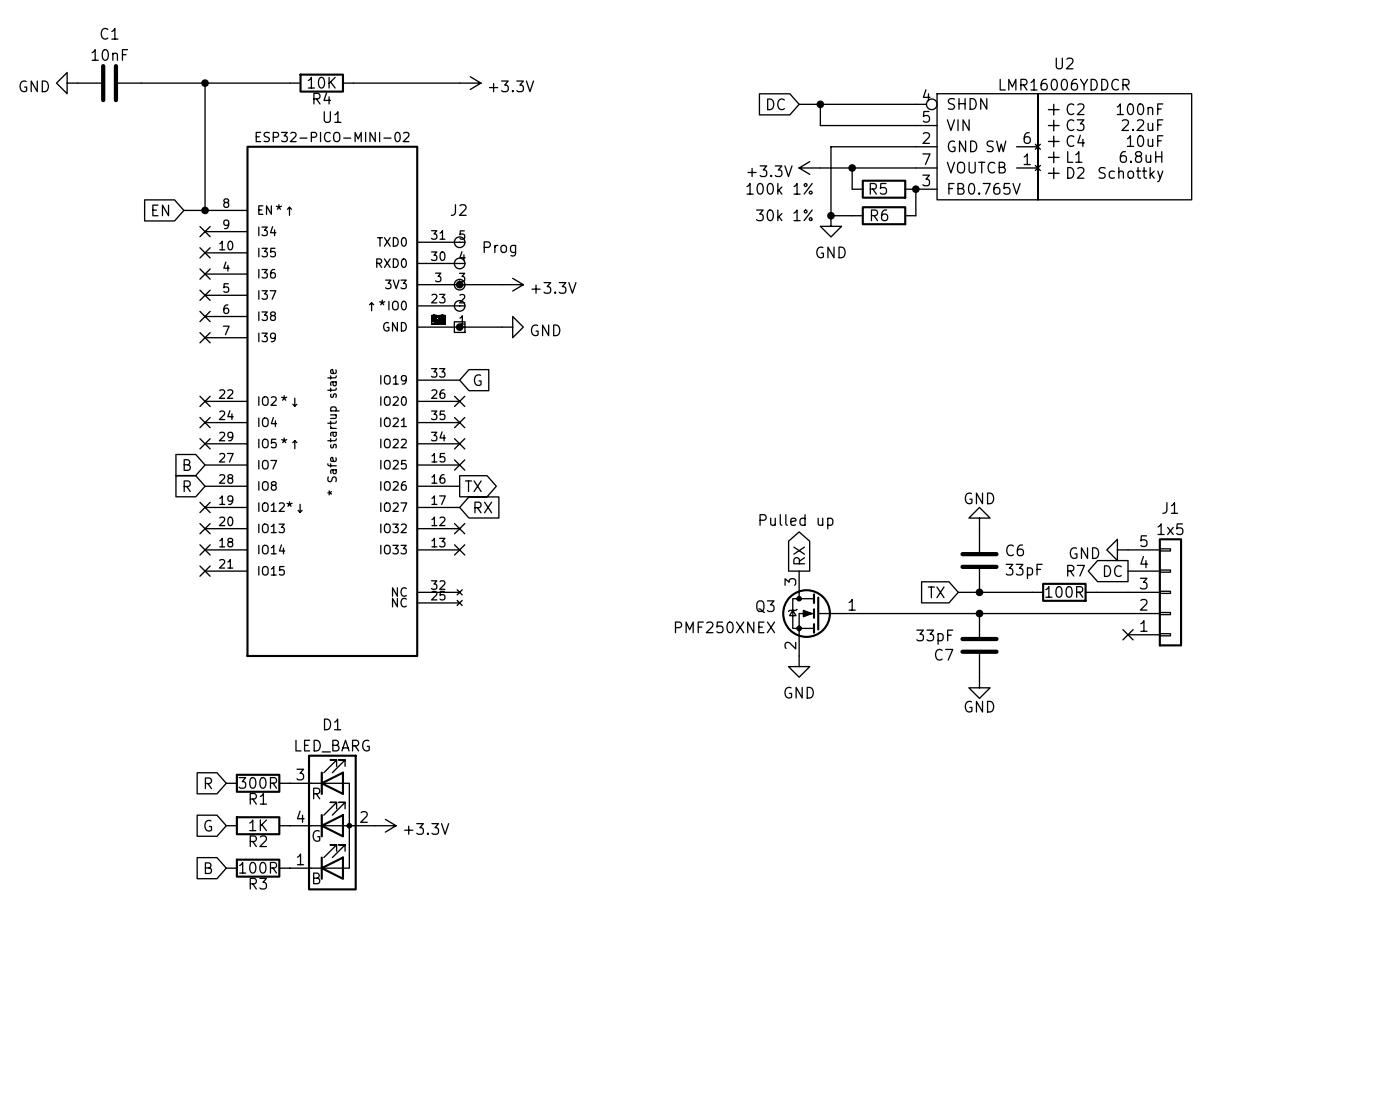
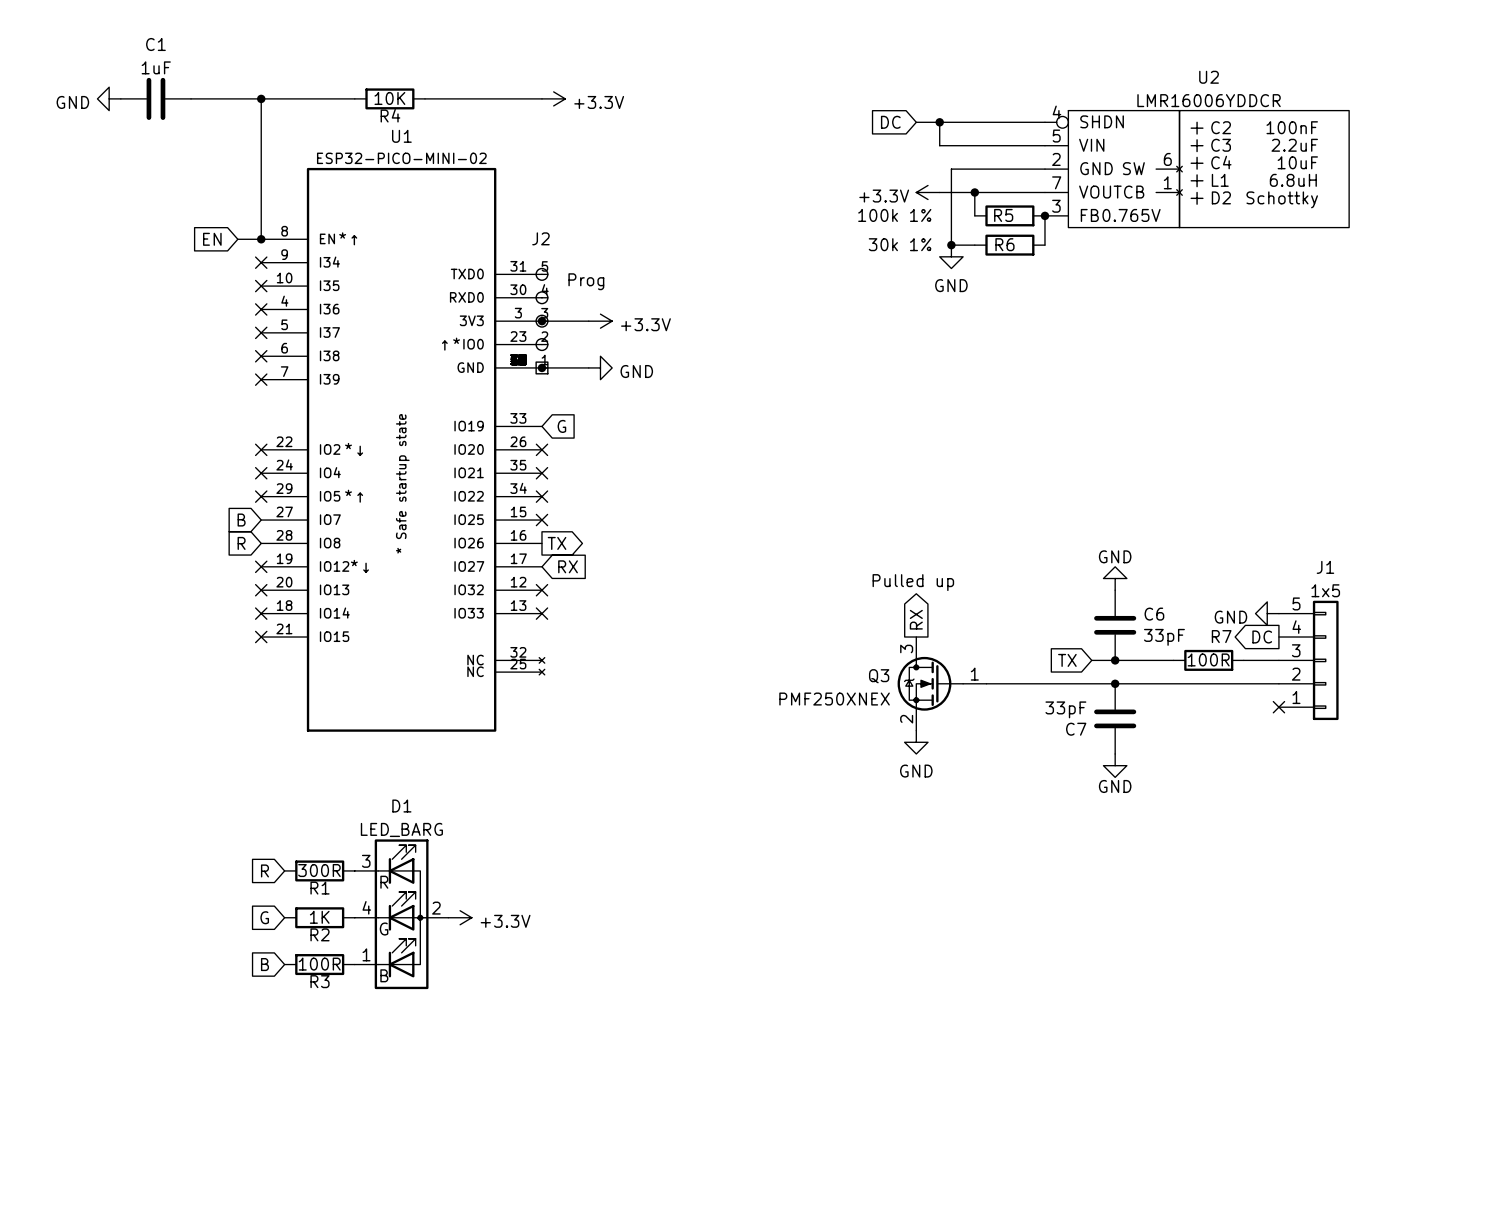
C1 value: 10nF (109, 54) -> 1uF (156, 67)

